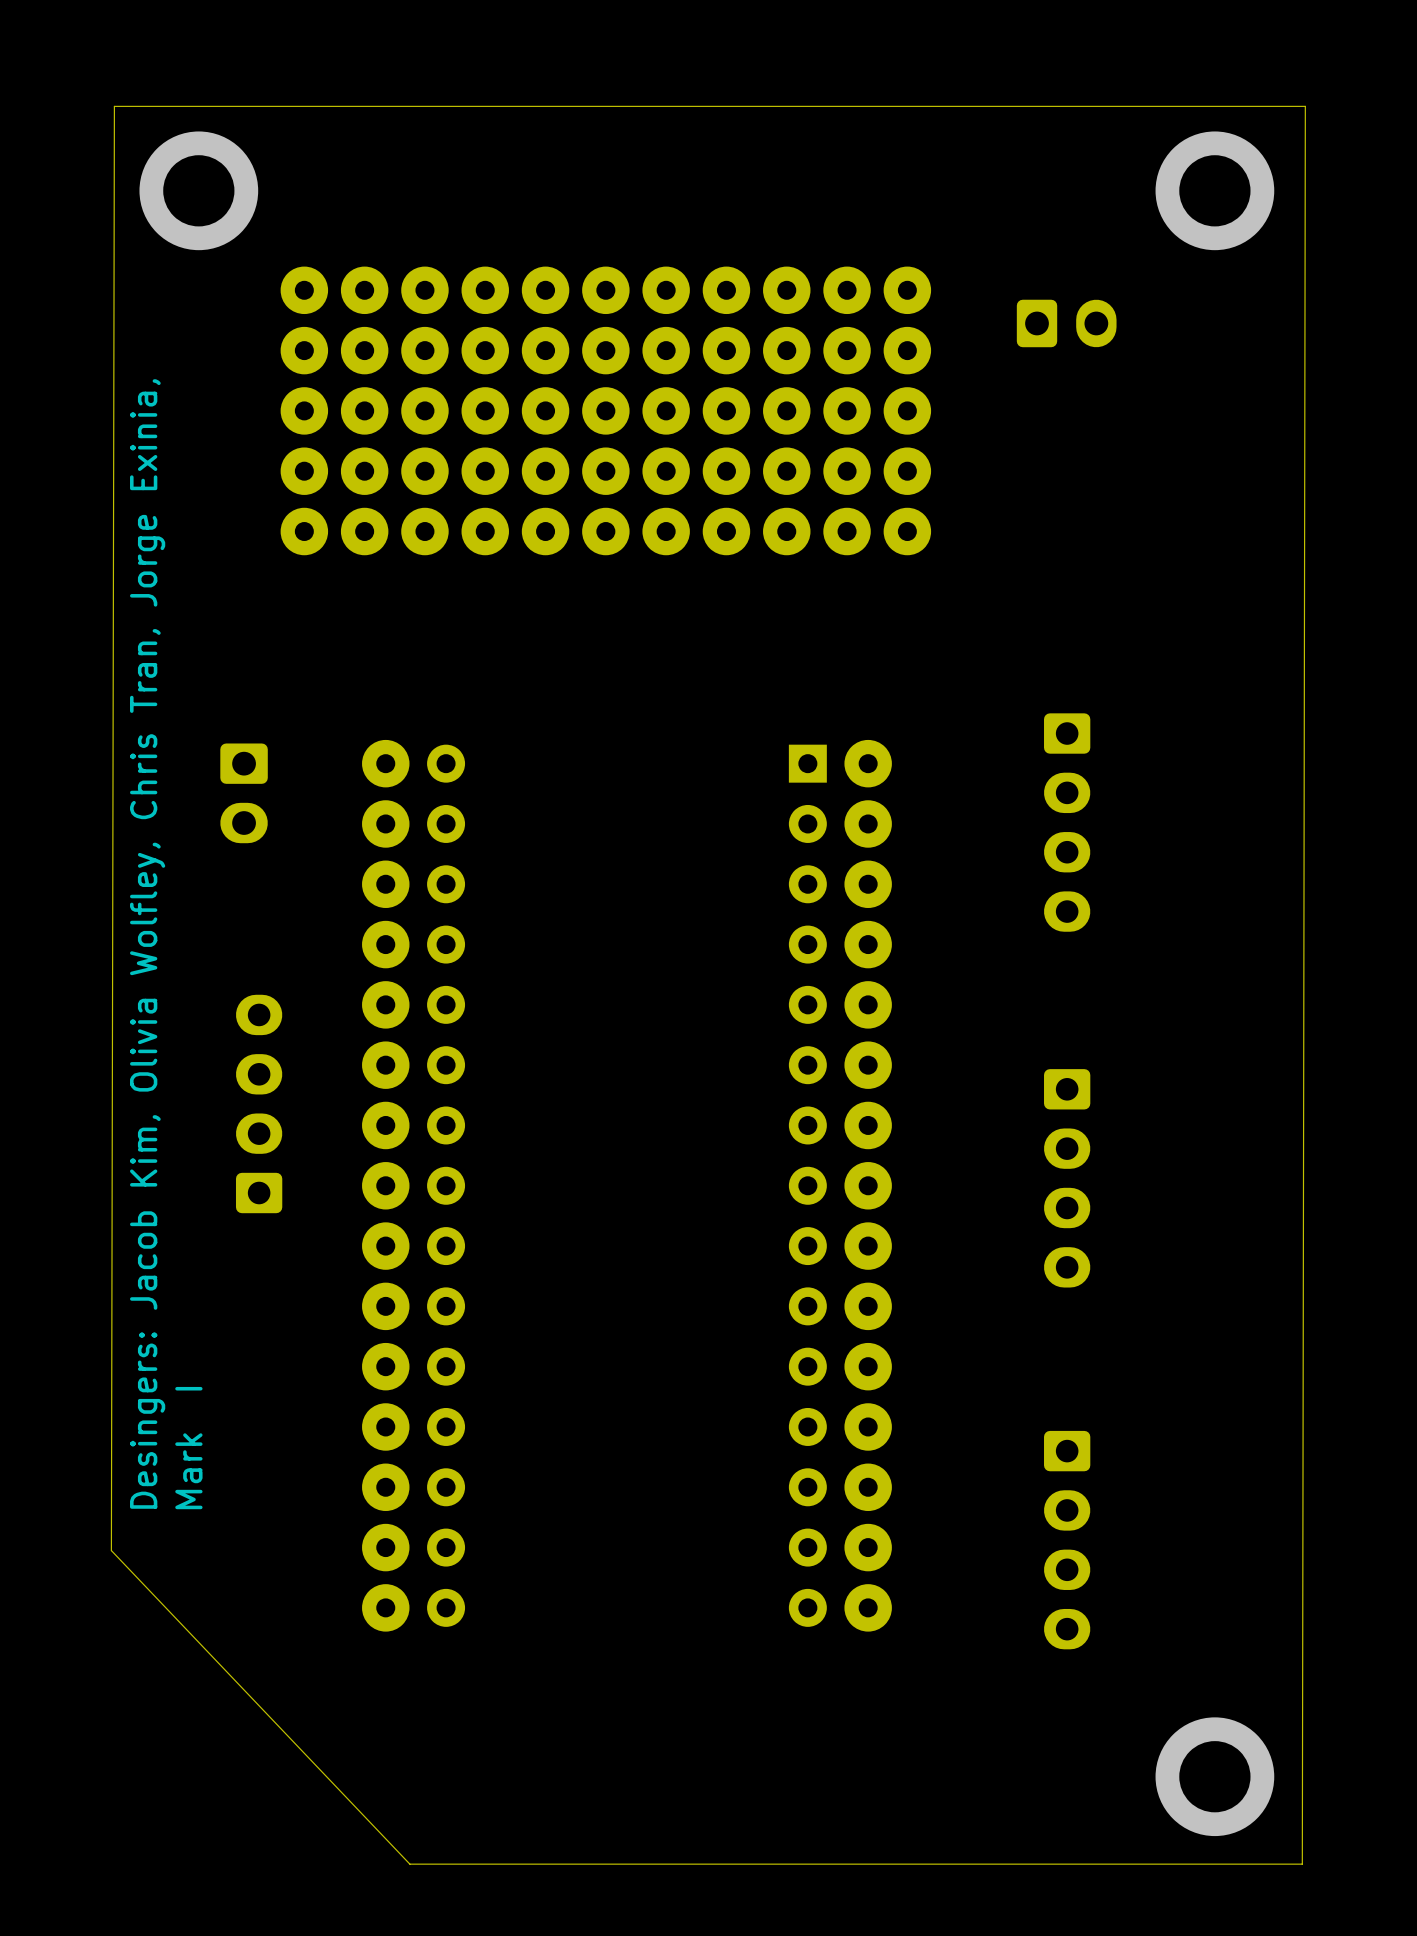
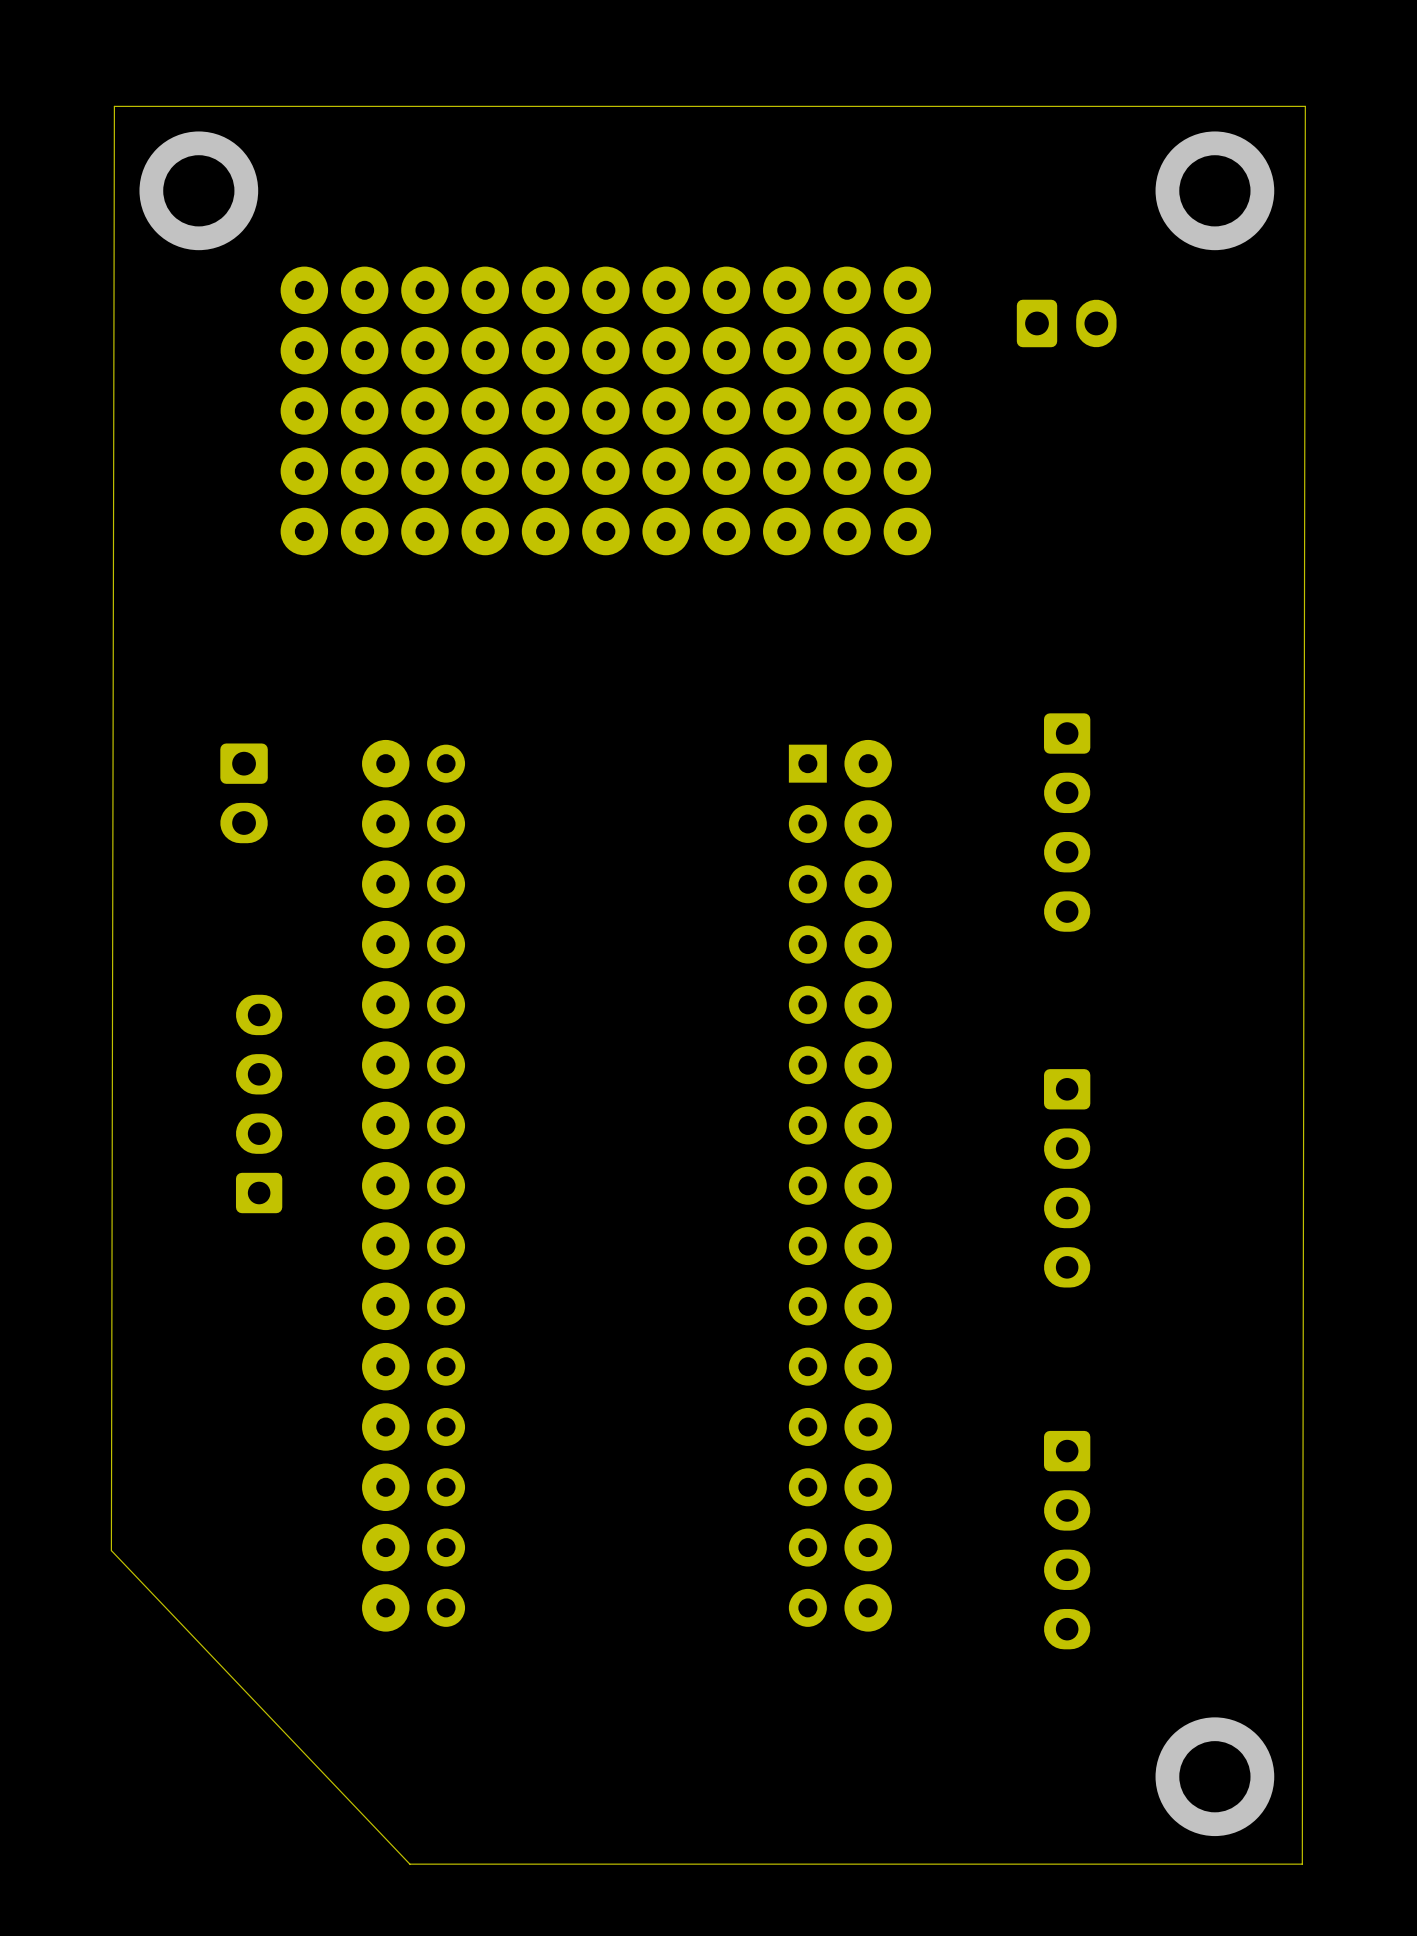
text: Desingers: Jacob Kim, Olivia Wolfley, Chris Tran, Jorge Exinia, (147, 944) -> none
text: Mark I (188, 1448) -> none

